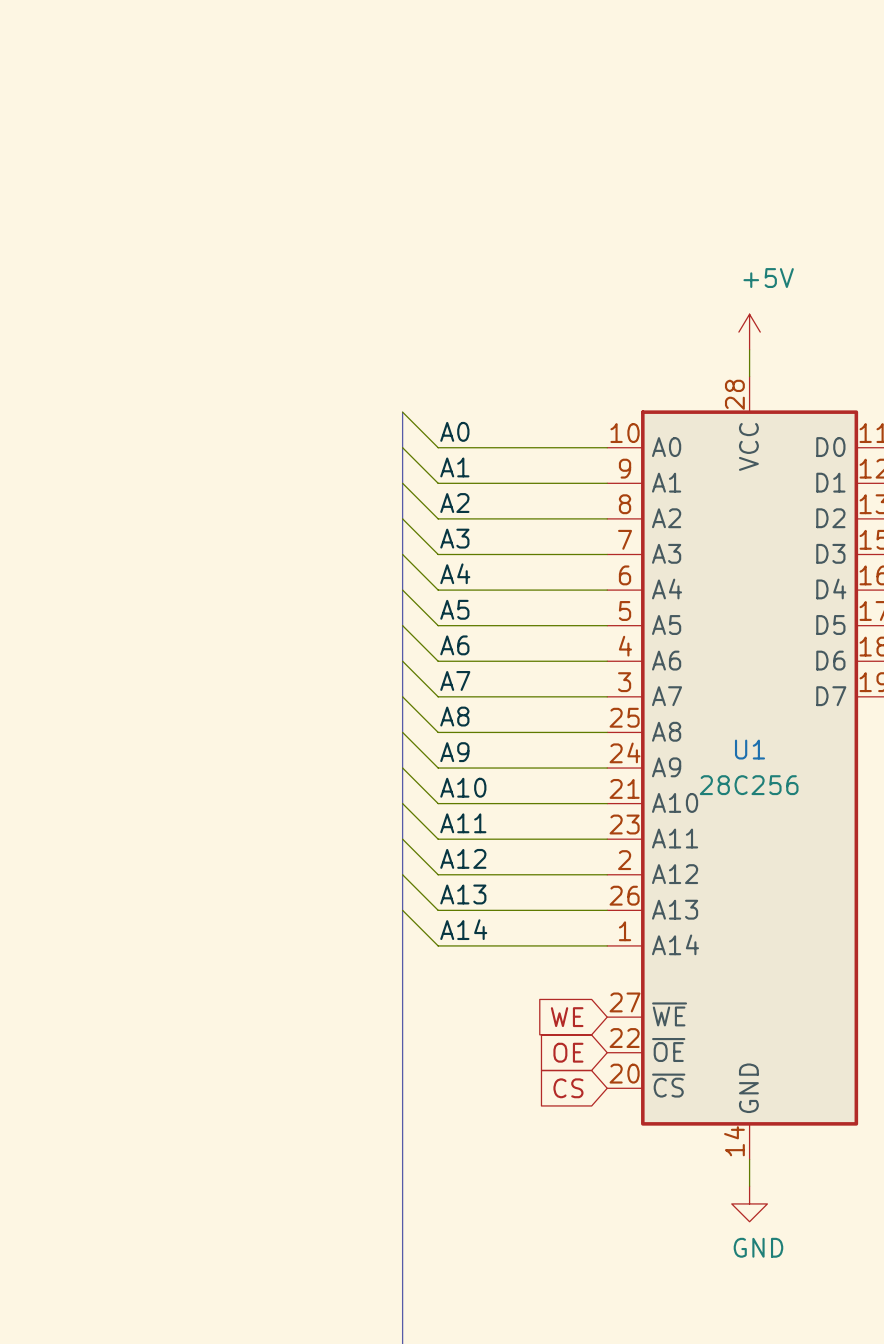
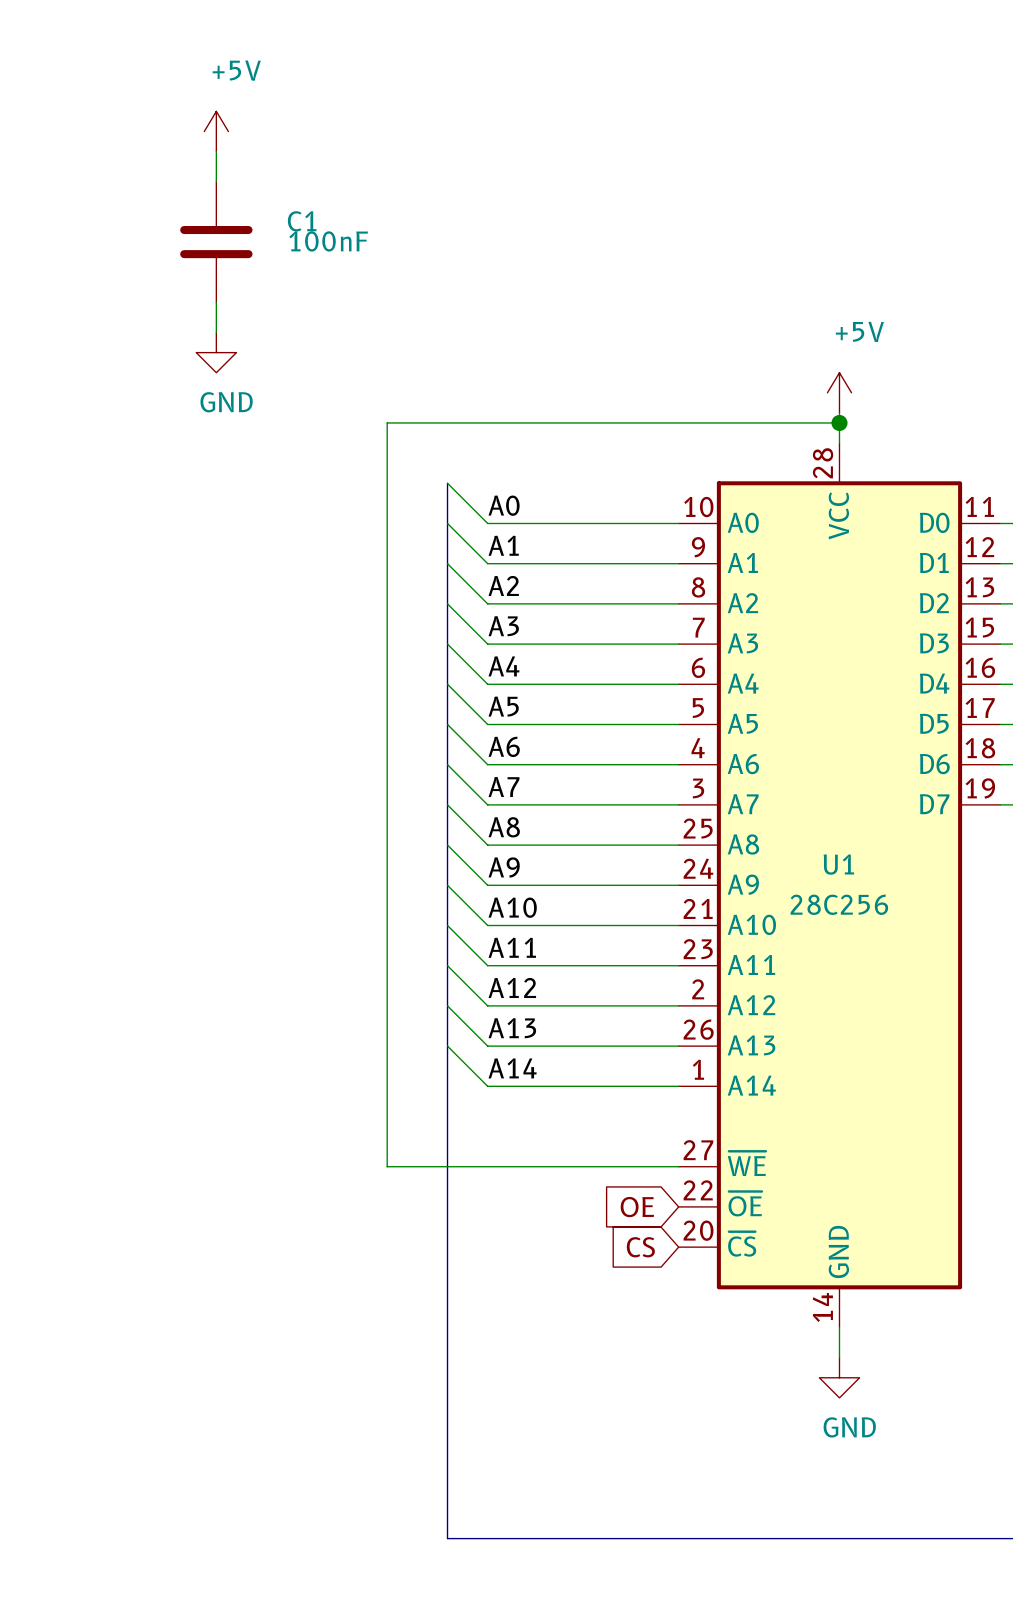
power symbol: none -> +5V (216, 131)
wire: none -> (216, 151) (216, 181)
C1: none -> 100nF (216, 242)
wire: none -> (216, 302) (216, 332)
power symbol: none -> GND (216, 352)
wire: none -> (839, 422) (387, 422) (387, 1166) (678, 1166)
junction: none -> (839, 422)
global label: WE (567, 1017) -> none

